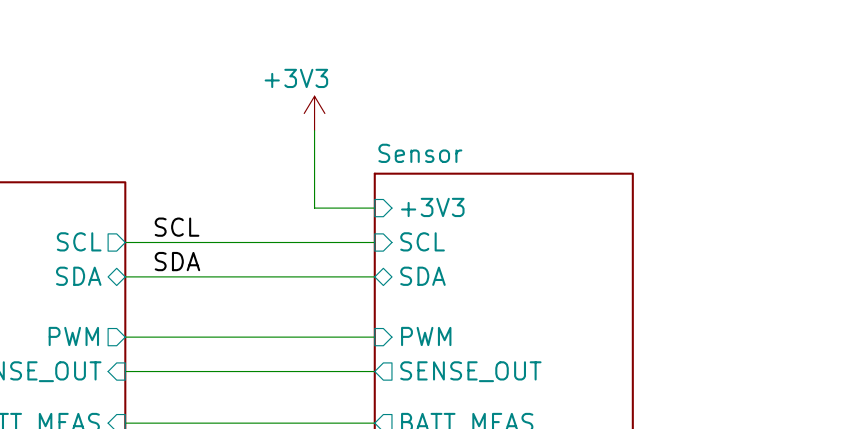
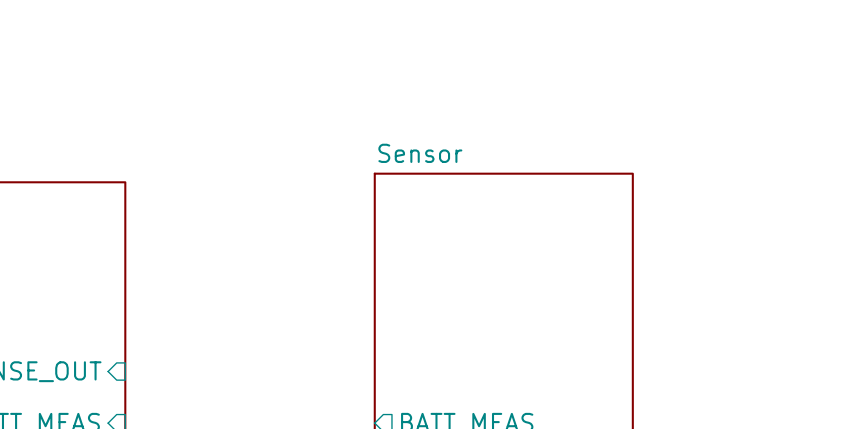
power symbol: +3V3 (314, 113) -> none
wire: (314, 130) (314, 208) (374, 208) -> none
sheet pin: +3V3 (432, 207) -> none
label: SCL (177, 227) -> none
sheet pin: SCL (79, 241) -> none
sheet pin: SCL (422, 241) -> none
wire: (125, 242) (374, 242) -> none
label: SDA (177, 261) -> none
sheet pin: SDA (78, 276) -> none
wire: (125, 276) (374, 276) -> none
sheet pin: SDA (422, 276) -> none
sheet pin: PWM (73, 336) -> none
sheet pin: PWM (426, 336) -> none
wire: (125, 337) (374, 337) -> none
wire: (125, 371) (374, 371) -> none
sheet pin: SENSE_OUT (470, 371) -> none
wire: (125, 423) (374, 423) -> none

